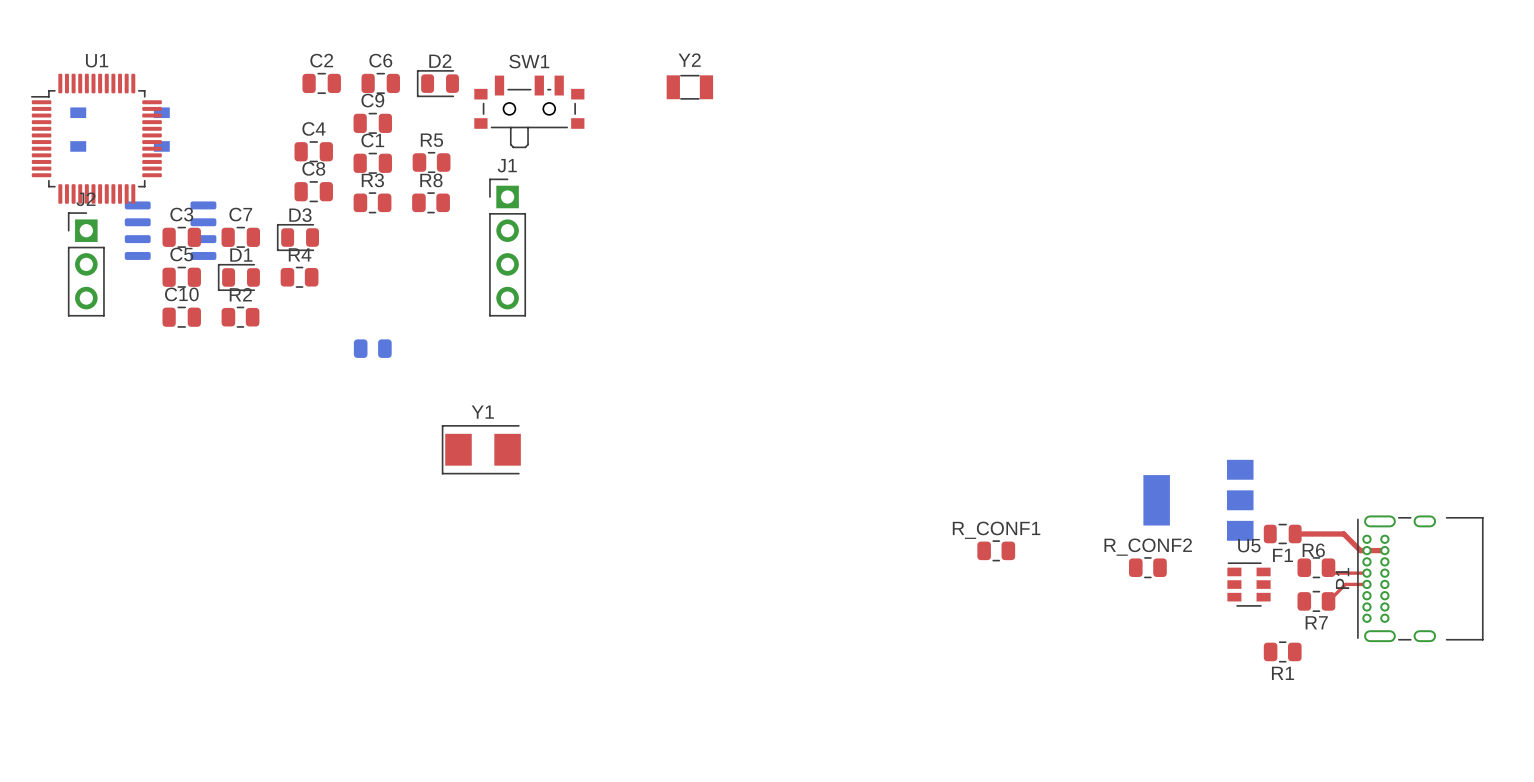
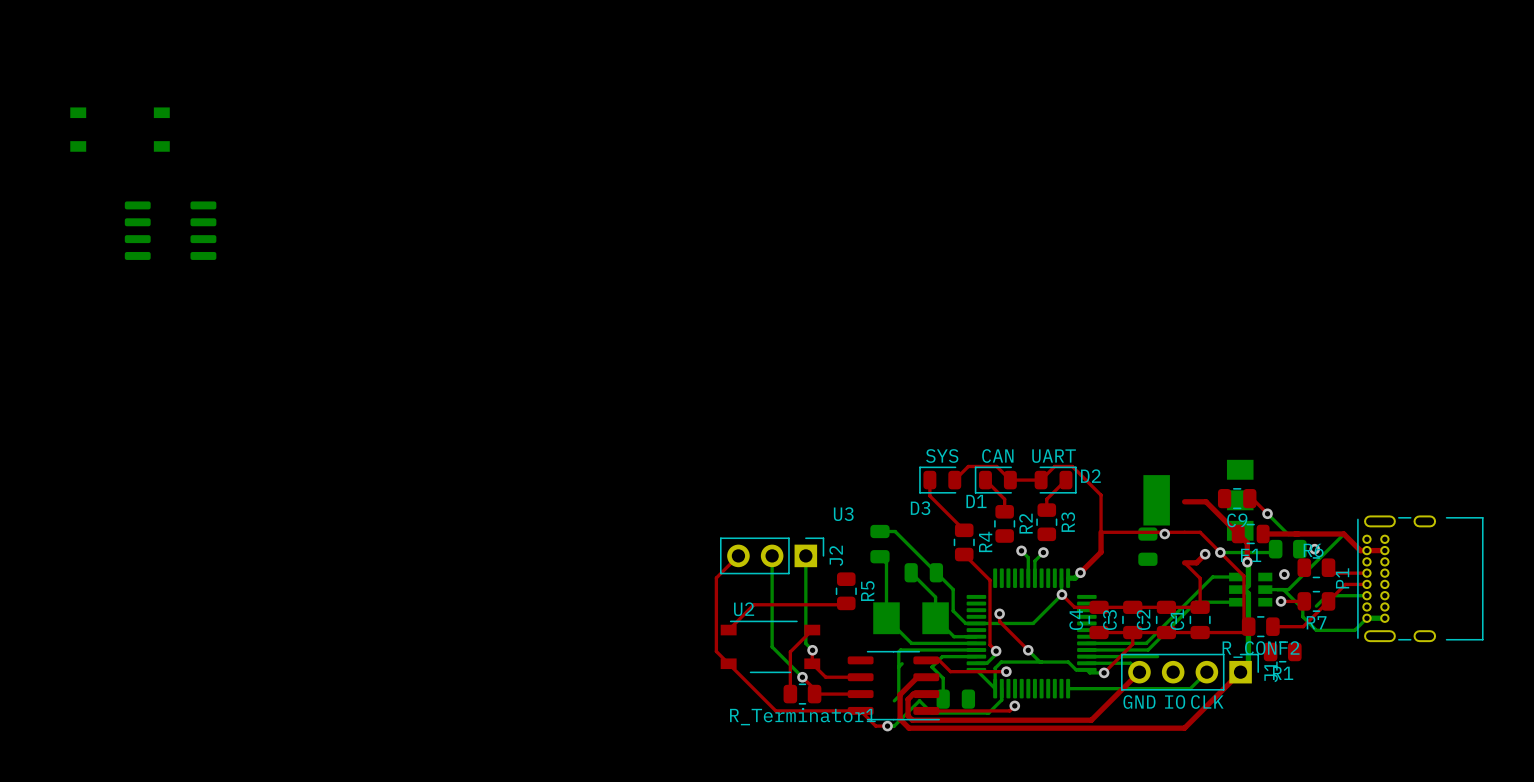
C2 name position: C2 (321, 60) -> C2 (1143, 619)
D2 name position: D2 (440, 61) -> D2 (1090, 476)
C2 rotation: 0° (321, 83) -> 90° clockwise (1166, 619)
C2 position: (321, 83) -> (1166, 619)
C6: (380, 83) -> none
D2 rotation: 0° (437, 83) -> 180° (1055, 480)
D2 position: (437, 83) -> (1055, 480)
Y2: (689, 87) -> none
C9 name position: C9 (372, 100) -> C9 (1237, 520)
SW1: (529, 111) -> none
C9 position: (372, 123) -> (1237, 498)
C4 name position: C4 (313, 128) -> C4 (1076, 619)
U1: (96, 138) -> none
C1 name position: C1 (372, 140) -> C1 (1177, 619)
C4 rotation: 0° (313, 151) -> 90° clockwise (1099, 619)
C4 position: (313, 151) -> (1099, 619)
R5 rotation: 0° (431, 162) -> 90° clockwise (846, 591)
R5 position: (431, 162) -> (846, 591)
C1 rotation: 0° (372, 163) -> 90° clockwise (1200, 619)
C1 position: (372, 163) -> (1200, 619)
C8: (313, 191) -> none
R3 rotation: 0° (372, 202) -> 90° clockwise (1046, 522)
R3 position: (372, 202) -> (1046, 522)
R8: (431, 202) -> none
C3 name position: C3 (181, 214) -> C3 (1109, 620)
D3 name position: D3 (300, 215) -> D3 (920, 508)
C3 rotation: 0° (181, 237) -> 90° clockwise (1132, 619)
C3 position: (181, 237) -> (1132, 619)
C7: (240, 237) -> none
D3 position: (297, 237) -> (940, 480)
J1 rotation: 0° (507, 247) -> 90° clockwise (1190, 672)
J1 position: (507, 247) -> (1190, 672)
D1 name position: D1 (241, 255) -> D1 (976, 501)
J2 rotation: 0° (86, 264) -> 90° clockwise (772, 555)
J2 position: (86, 264) -> (772, 555)
C5: (181, 277) -> none
D1 position: (238, 277) -> (995, 480)
R4 rotation: 0° (299, 277) -> 90° clockwise (964, 542)
R4 position: (299, 277) -> (964, 542)
C10: (181, 317) -> none
R2 rotation: 0° (240, 317) -> 90° clockwise (1004, 523)
R2 position: (240, 317) -> (1004, 523)
part: (372, 348) -> none
Y1: (481, 449) -> none
text: none -> SYS (942, 455)
text: none -> CAN (997, 455)
text: none -> UART (1054, 456)
top track: none -> (929, 480) (929, 495) (964, 530)
top track: none -> (954, 480) (968, 466) (996, 466) (1010, 480) (1041, 480) (1054, 466) (1072, 466) (1101, 495) (1101, 532)
top track: none -> (985, 480) (1004, 499) (1004, 511)
top track: none -> (1065, 480) (1046, 499) (1046, 510)
top track: none -> (1249, 498) (1252, 498) (1267, 513)
top track: none -> (1184, 501) (1206, 501) (1247, 543) (1247, 562)
bottom track: none -> (1267, 513) (1288, 534) (1300, 534)
via: none -> (1267, 513)
bottom track: none -> (879, 531) (895, 531) (953, 589) (953, 610) (965, 623) (1033, 623) (1061, 594) (1061, 578)
top track: none -> (1101, 532) (1163, 532) (1164, 534) (1166, 532) (1200, 532) (1243, 576) (1243, 621) (1248, 626) (1242, 632) (1099, 632)
top track: none -> (1101, 532) (1101, 552) (1080, 572)
via: none -> (1164, 534)
top track: none -> (1263, 534) (1295, 534)
F1 position: (1282, 534) -> (1250, 534)
bottom track: none -> (1342, 534) (1288, 589) (1265, 589)
part: none -> (879, 544)
part: none -> (1147, 546)
R_CONF2 name position: R_CONF2 (1148, 547) -> R_CONF2 (1261, 649)
bottom track: none -> (1275, 549) (1272, 552) (1220, 552)
via: none -> (1314, 549)
R_CONF1 side: top (996, 550) -> bottom (1287, 549)
bottom track: none -> (1021, 550) (1028, 557) (1028, 578)
via: none -> (1021, 550)
bottom track: none -> (1043, 552) (1034, 561) (1034, 578)
via: none -> (1043, 552)
via: none -> (1220, 552)
top track: none -> (1205, 554) (1196, 562) (1184, 562) (1200, 578) (1200, 607) (1074, 607) (1061, 594)
via: none -> (1205, 554)
top track: none -> (738, 555) (716, 577) (716, 651) (775, 710) (860, 710) (875, 726) (887, 726)
bottom track: none -> (772, 555) (772, 646) (802, 677)
bottom track: none -> (805, 555) (805, 643) (812, 650)
bottom track: none -> (879, 556) (886, 563) (886, 618) (911, 643) (976, 643)
top track: none -> (964, 557) (964, 554) (989, 580) (989, 644) (996, 651)
bottom track: none -> (1247, 562) (1248, 585) (1244, 589)
via: none -> (1247, 562)
R_CONF2 position: (1147, 567) -> (1260, 626)
bottom track: none -> (911, 572) (935, 597) (935, 618) (954, 636) (976, 636)
part: none -> (923, 572)
bottom track: none -> (1080, 572) (1075, 578) (1068, 578)
via: none -> (1080, 572)
via: none -> (1284, 574)
bottom track: none -> (1236, 577) (1212, 577) (1146, 643) (1086, 643)
U5 side: top (1249, 584) -> bottom (1250, 589)
bottom track: none -> (1244, 589) (1248, 593) (1248, 664) (1240, 672)
bottom track: none -> (1283, 589) (1302, 608) (1302, 616) (1316, 630) (1354, 630) (1366, 618) (1384, 618)
via: none -> (1061, 594)
bottom track: none -> (1366, 595) (1326, 595) (1316, 606)
top track: none -> (1302, 599) (1304, 601) (1281, 601)
via: none -> (1281, 601)
top track: none -> (1328, 601) (1303, 626) (1272, 626)
bottom track: none -> (1236, 602) (1195, 602) (1148, 650) (1086, 650)
top track: none -> (846, 603) (753, 604) (728, 630)
top track: none -> (999, 613) (999, 621) (1028, 650)
via: none -> (999, 613)
part: none -> (911, 618)
top track: none -> (812, 630) (790, 651) (790, 694)
top track: none -> (1132, 632) (1132, 644) (1104, 672)
part: none -> (1031, 633)
U2: none -> (770, 646)
top track: none -> (812, 650) (812, 663) (825, 677) (860, 677)
via: none -> (812, 650)
bottom track: none -> (976, 650) (900, 650) (898, 651) (898, 696) (894, 700)
bottom track: none -> (1028, 650) (1040, 662)
via: none -> (1028, 650)
bottom track: none -> (996, 651) (996, 654) (987, 663) (976, 663)
via: none -> (996, 651)
bottom track: none -> (976, 656) (942, 656) (931, 667) (943, 678) (943, 699)
bottom track: none -> (1086, 656) (1157, 656)
top track: none -> (926, 660) (939, 660) (950, 671) (1006, 671)
bottom track: none -> (902, 663) (898, 667)
bottom track: none -> (1086, 663) (1130, 663) (1139, 672)
bottom track: none -> (976, 669) (995, 688) (995, 668) (1001, 662) (1068, 662) (1076, 669) (1086, 669) (1089, 672) (1104, 672)
via: none -> (1006, 671)
via: none -> (1104, 672)
top track: none -> (1139, 672) (1091, 720) (912, 720) (908, 715) (908, 699) (913, 694) (926, 694)
bottom track: none -> (1206, 672) (1190, 688) (1068, 688)
top track: none -> (1240, 672) (1184, 728) (909, 728) (900, 719) (900, 694) (917, 677) (926, 677)
top track: none -> (802, 677) (814, 689) (814, 694) (860, 694)
via: none -> (802, 677)
U3: none -> (893, 685)
bottom track: none -> (1001, 688) (1001, 699) (988, 713) (931, 713) (919, 700) (894, 726) (887, 726)
R_Terminator1: none -> (802, 694)
part: none -> (955, 699)
text: none -> GND (1139, 702)
text: none -> IO (1175, 702)
text: none -> CLK (1207, 702)
top track: none -> (1014, 705) (1009, 710) (926, 710)
via: none -> (1014, 705)
via: none -> (887, 726)

